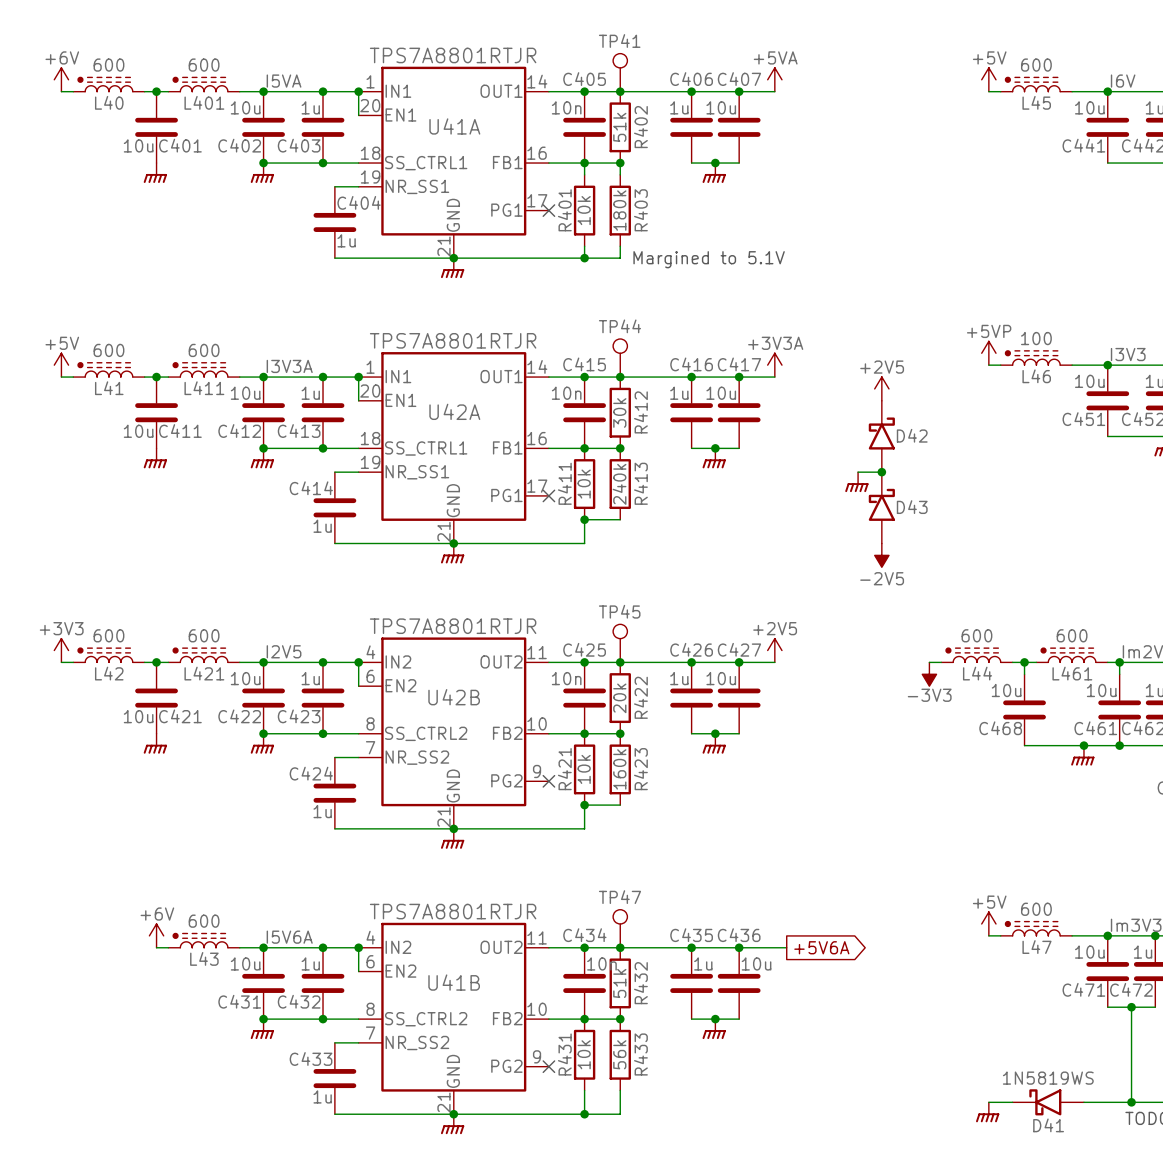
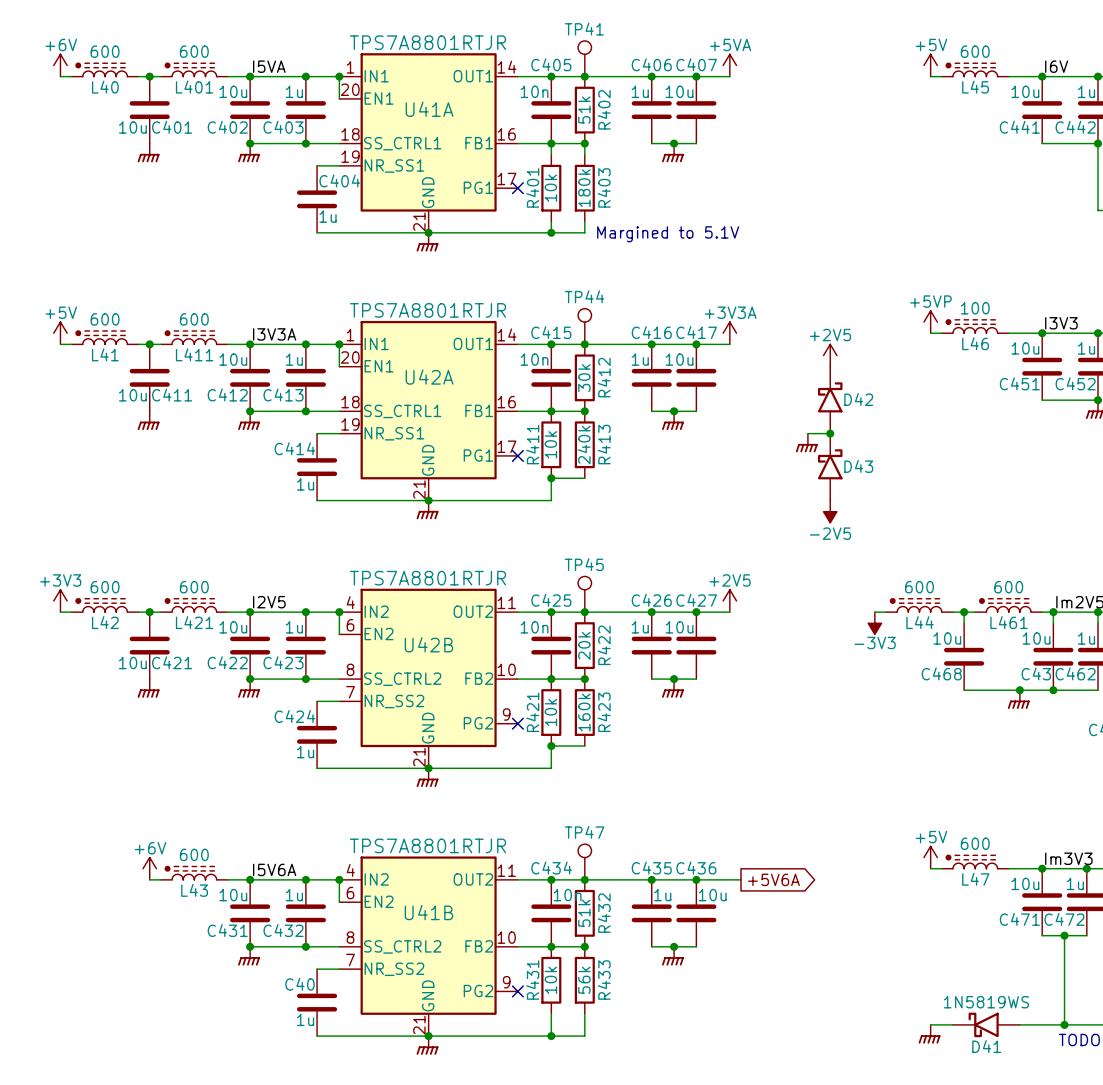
C461 name: C461 (1095, 728) -> C43 (1036, 673)
C433 name: C433 (311, 1058) -> C40 (299, 984)

